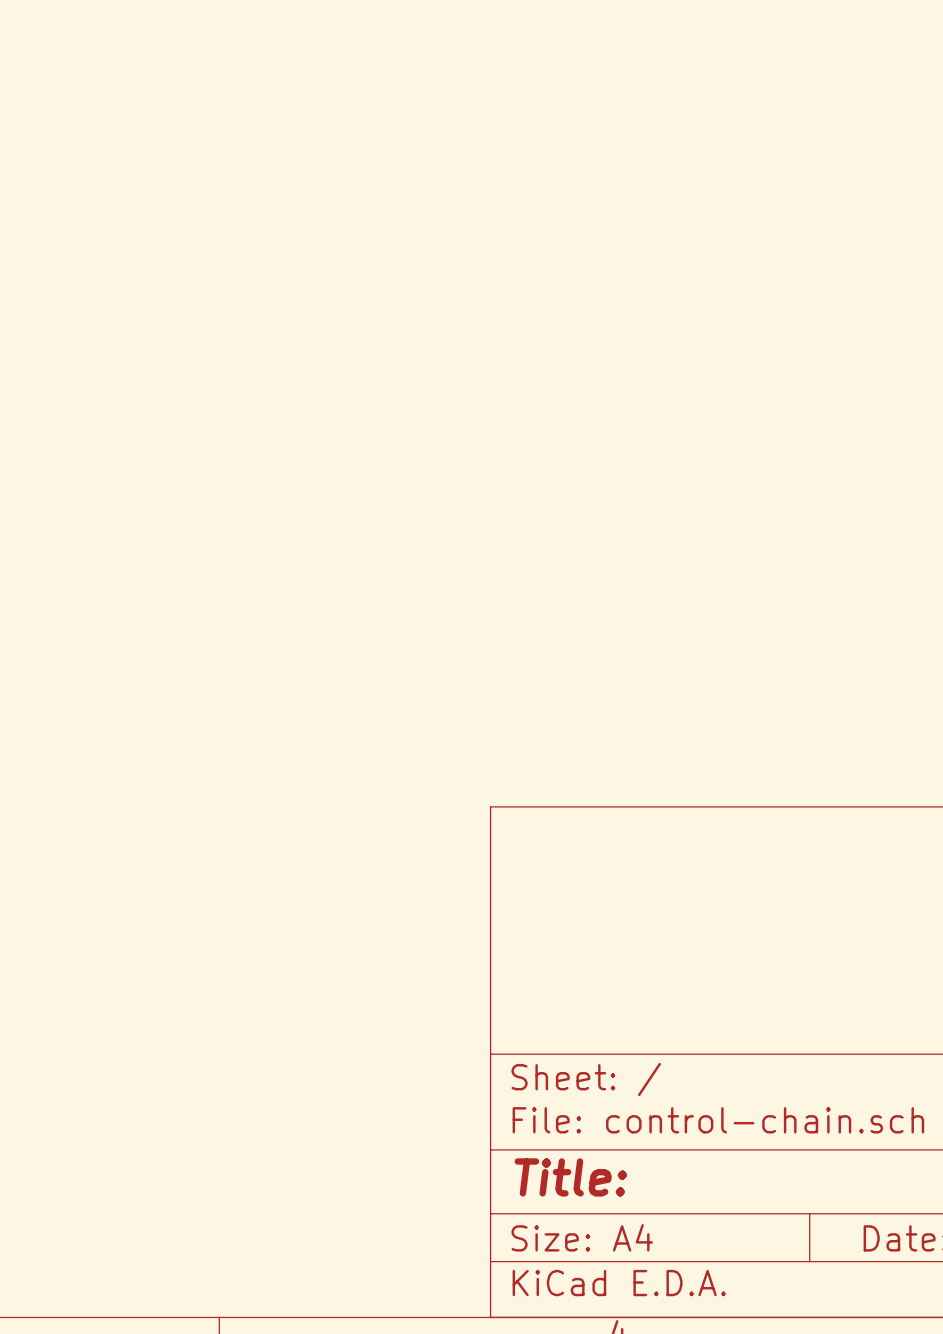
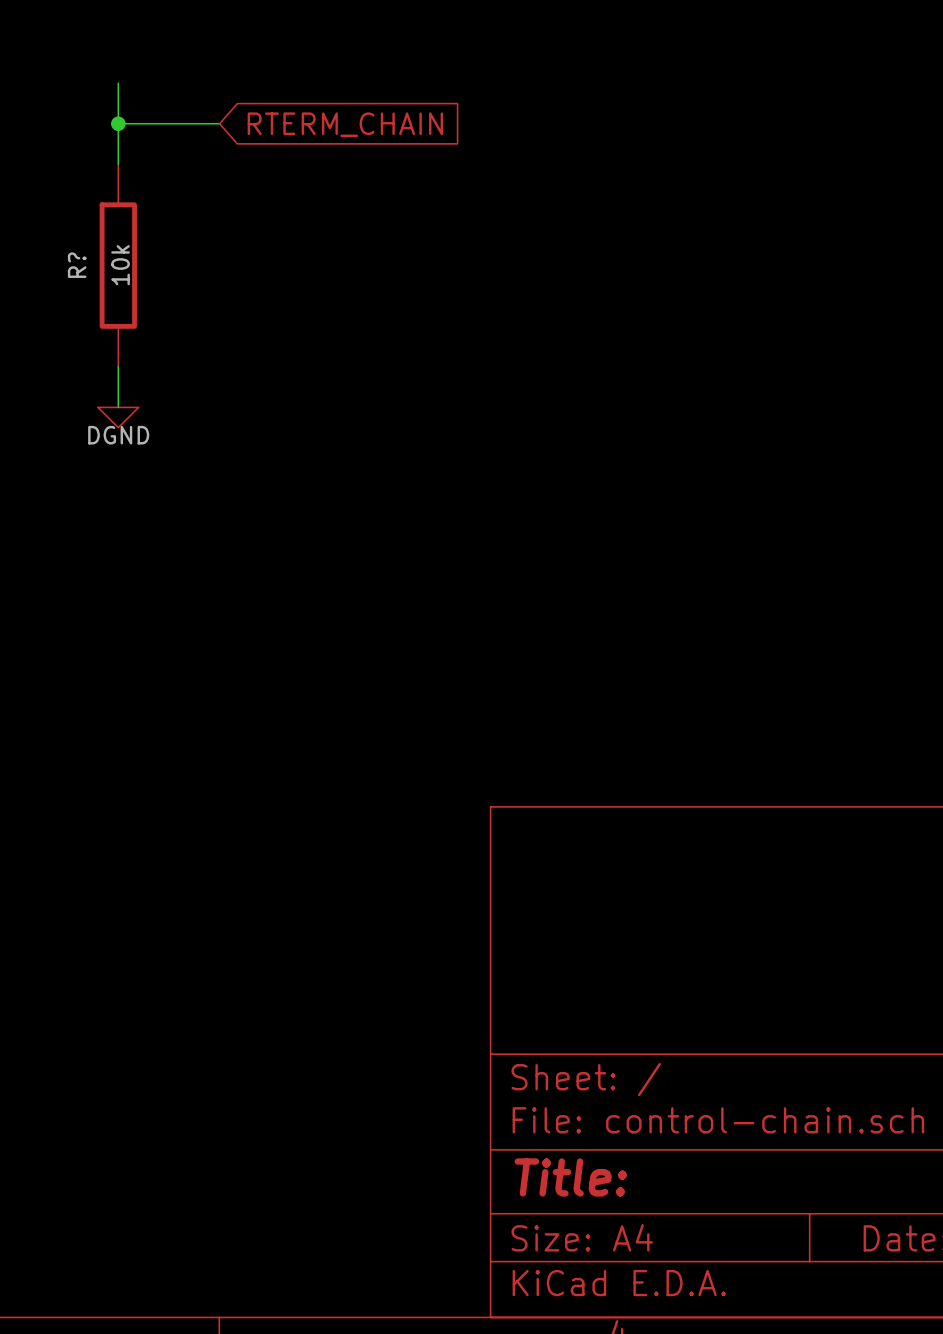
wire: none -> (118, 83) (118, 164)
wire: none -> (118, 123) (219, 123)
junction: none -> (118, 123)
global label: none -> RTERM_CHAIN (345, 124)
R?: none -> 10k (118, 265)
wire: none -> (118, 366) (118, 407)
power symbol: none -> DGND (118, 417)

